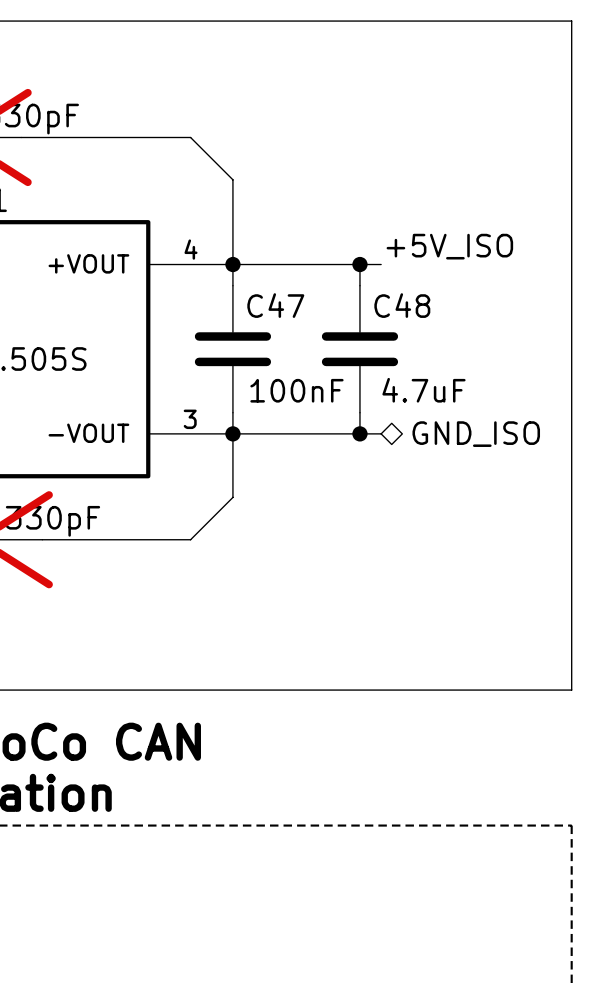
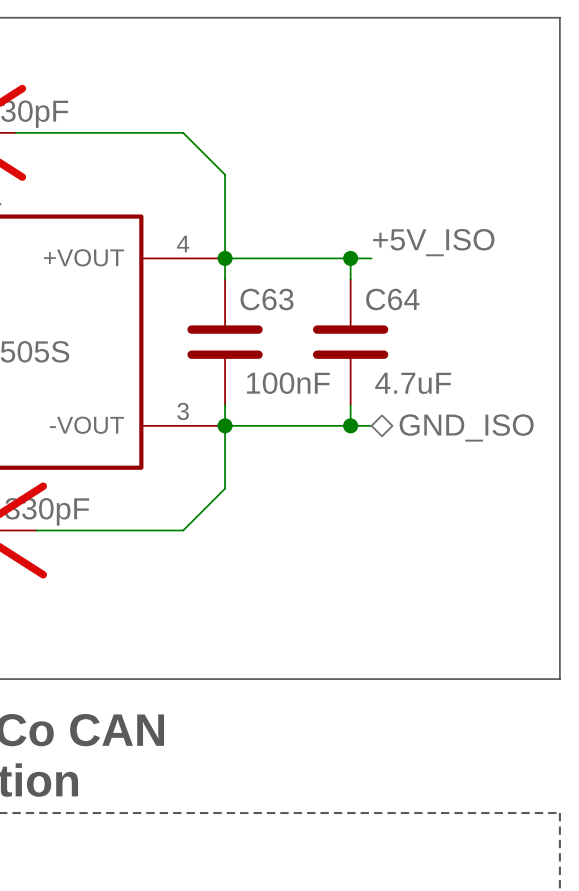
C47 name: C47 (275, 305) -> C63 (267, 299)
C48 name: C48 (402, 305) -> C64 (392, 299)

